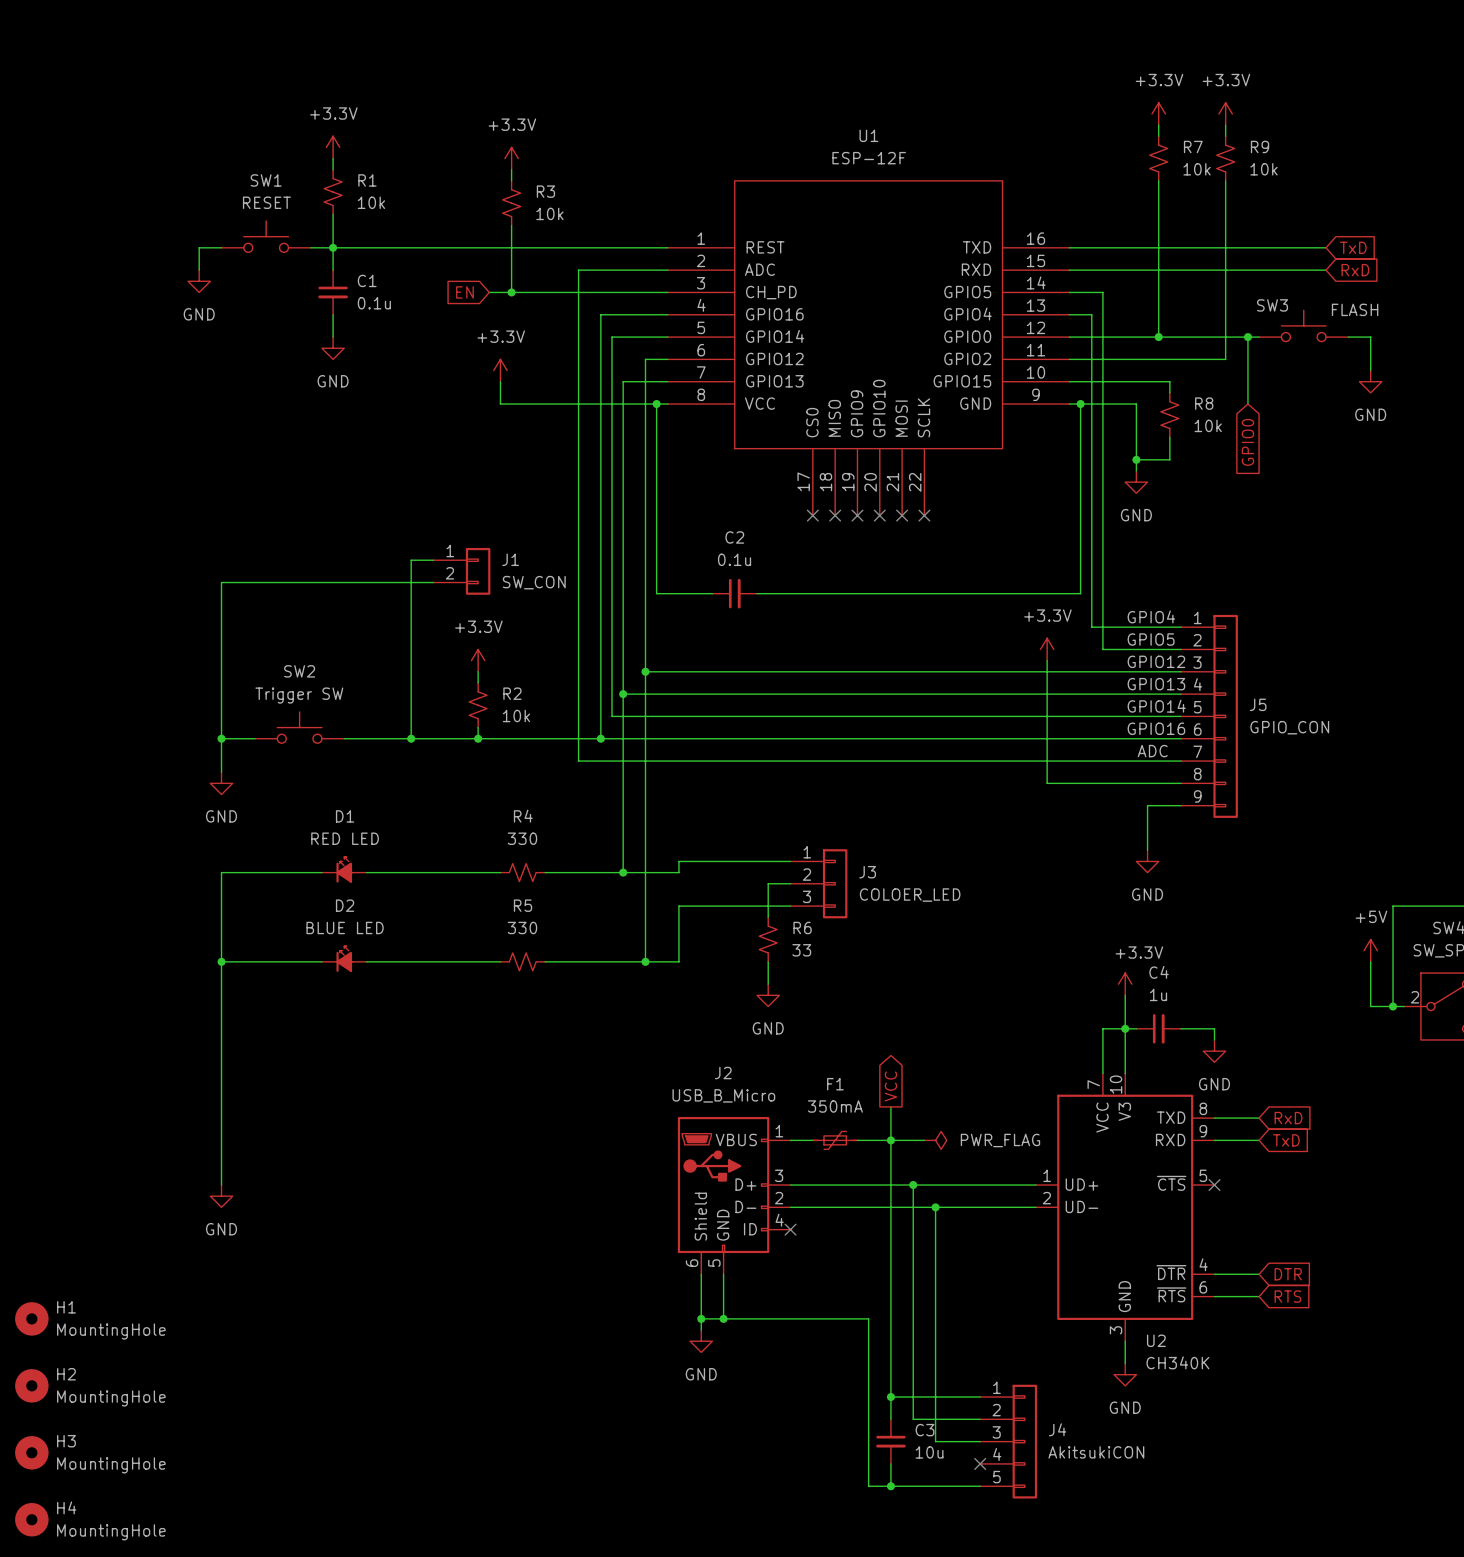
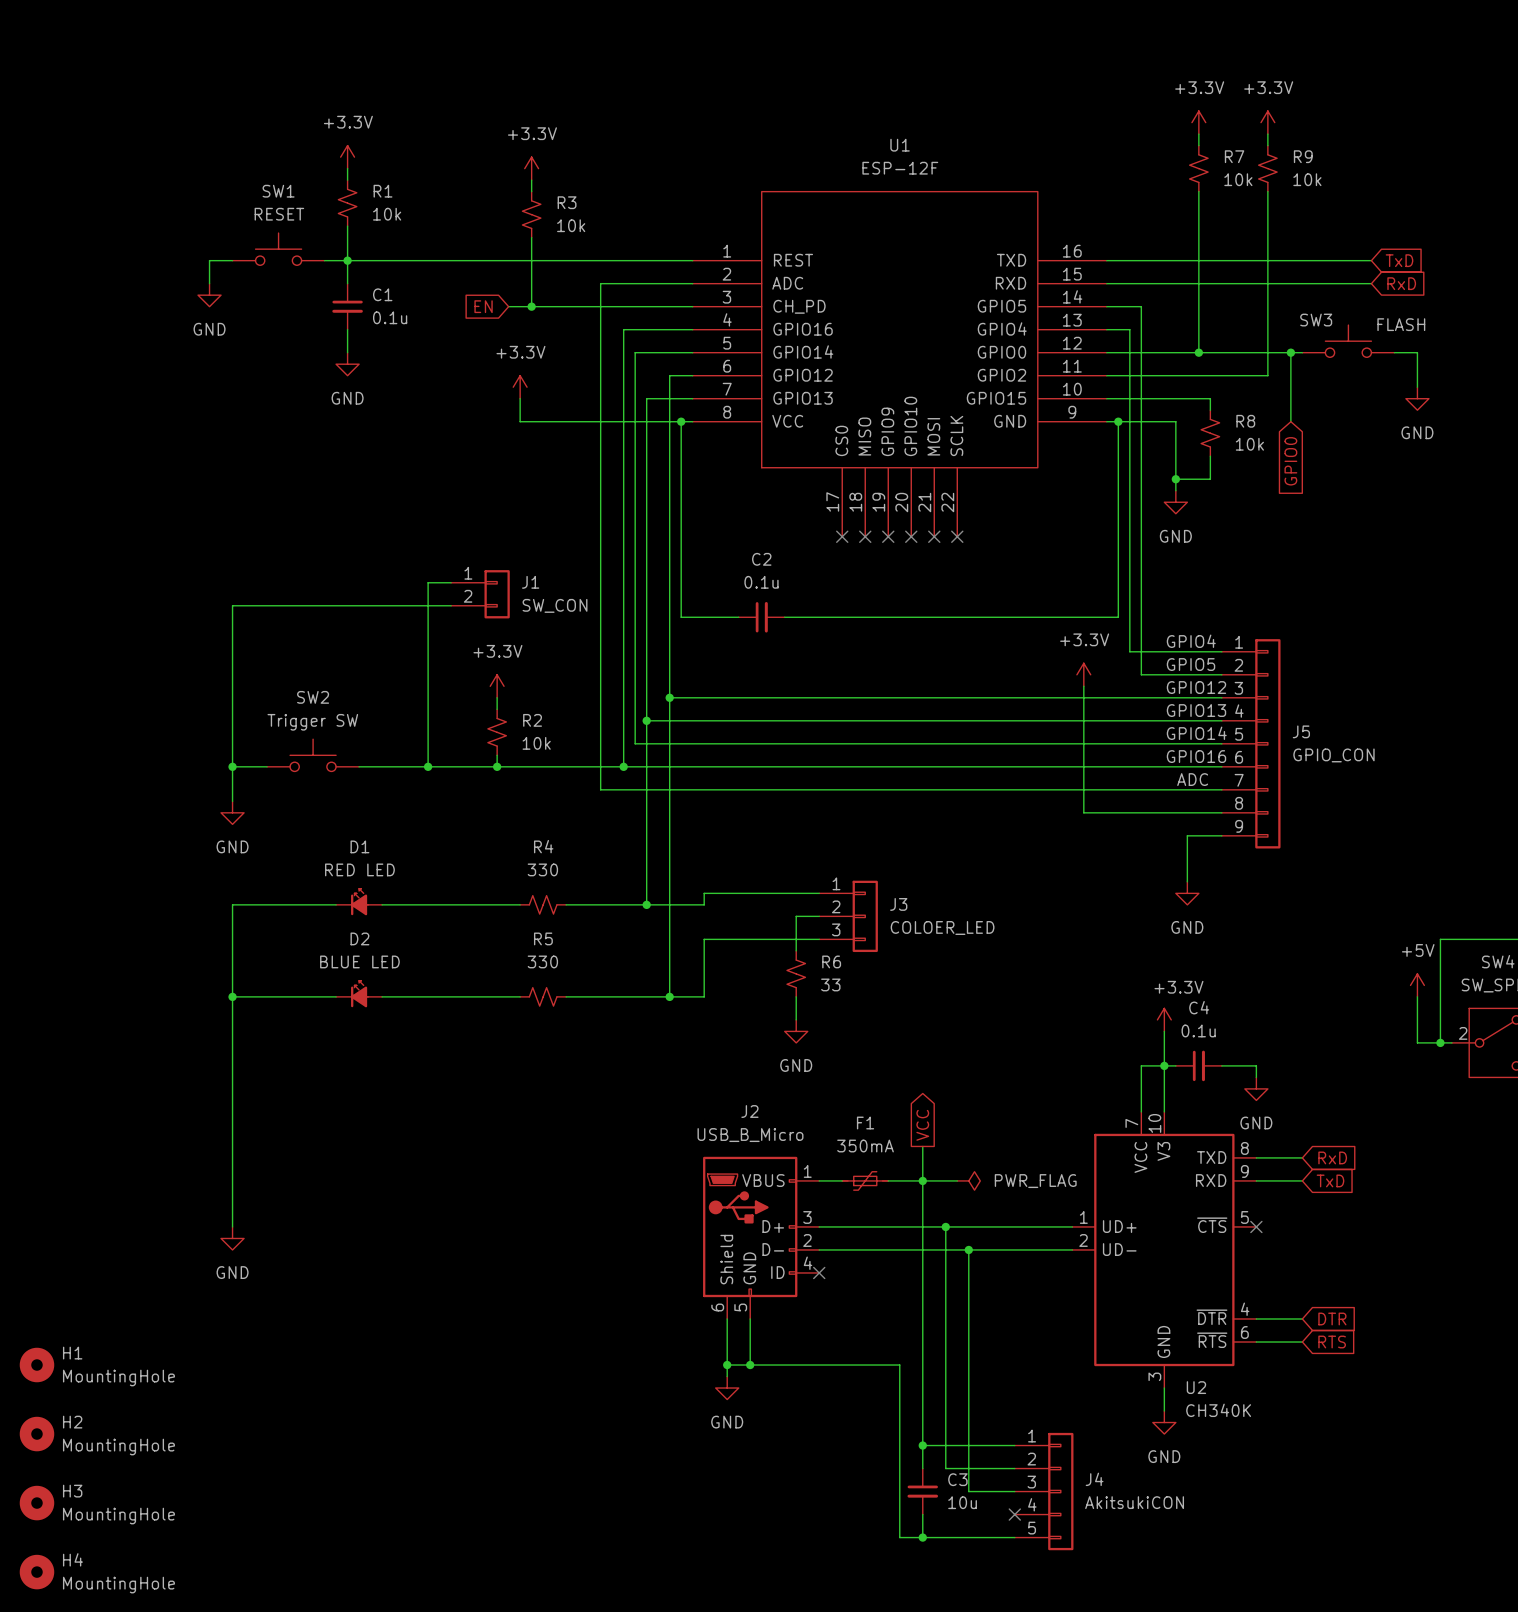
C4 value: 1u (1158, 994) -> 0.1u (1198, 1030)

